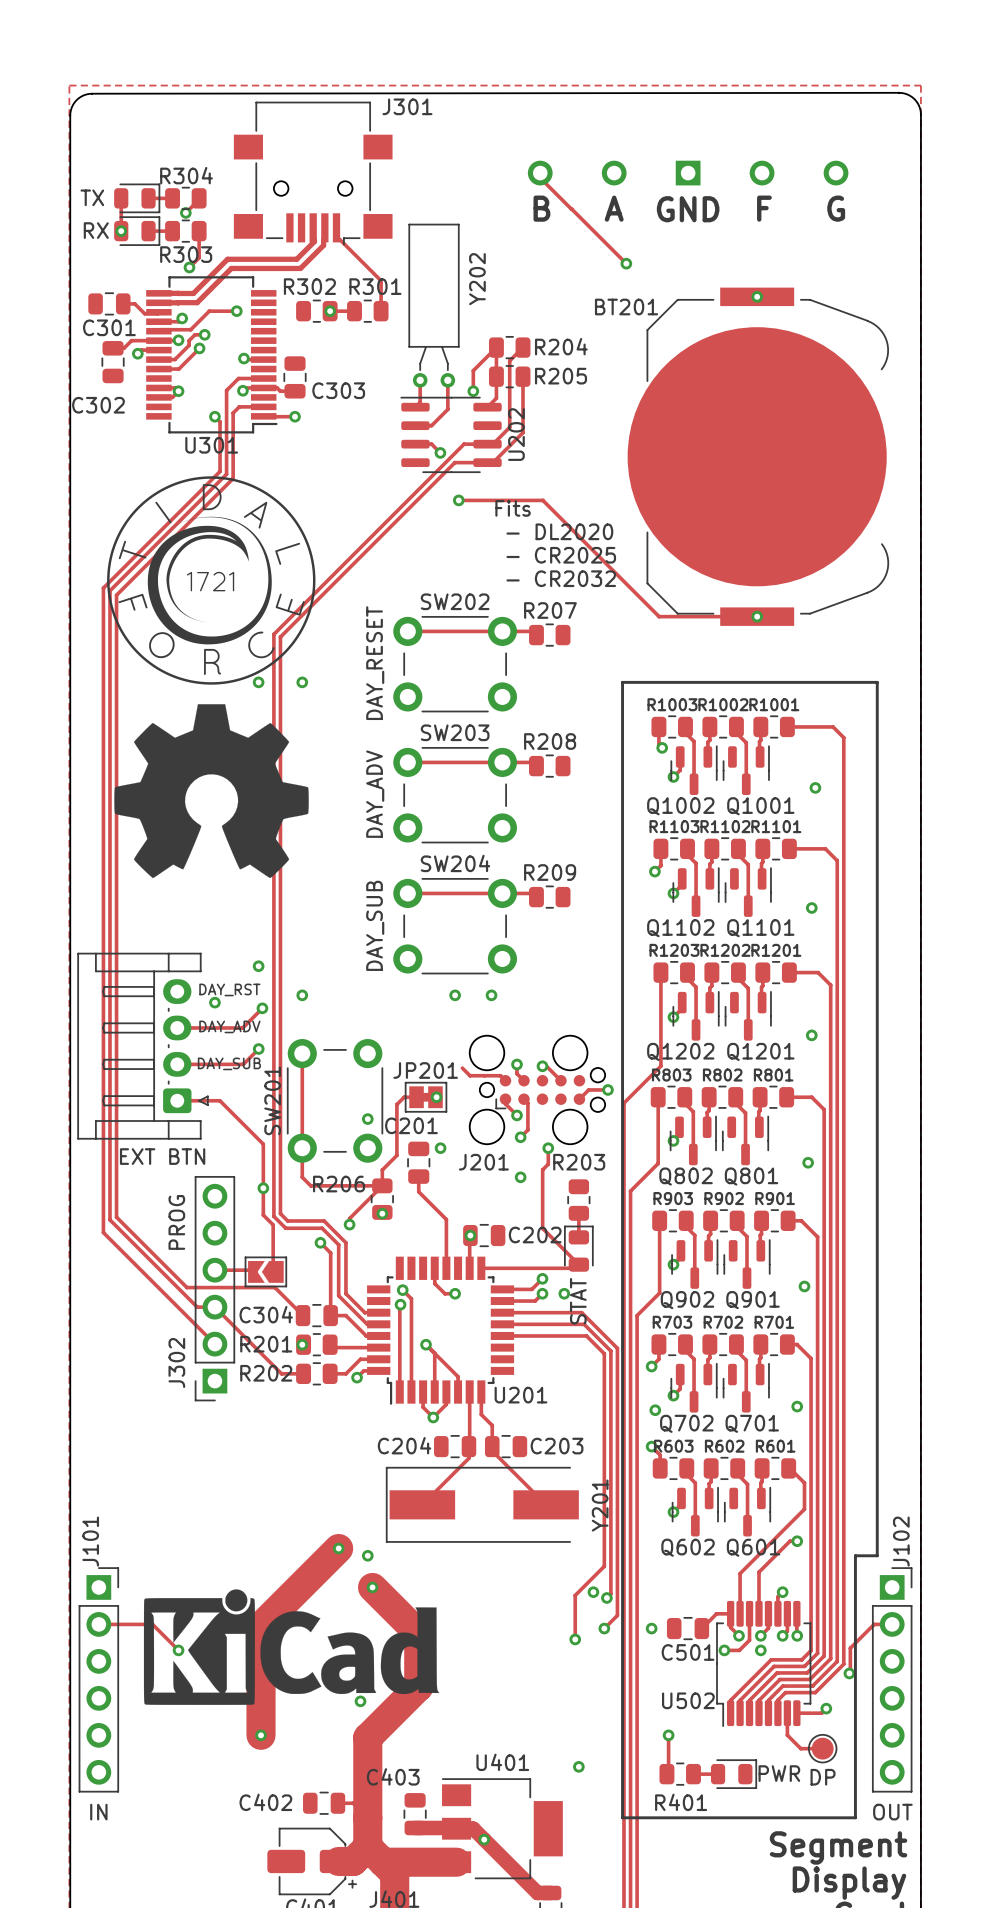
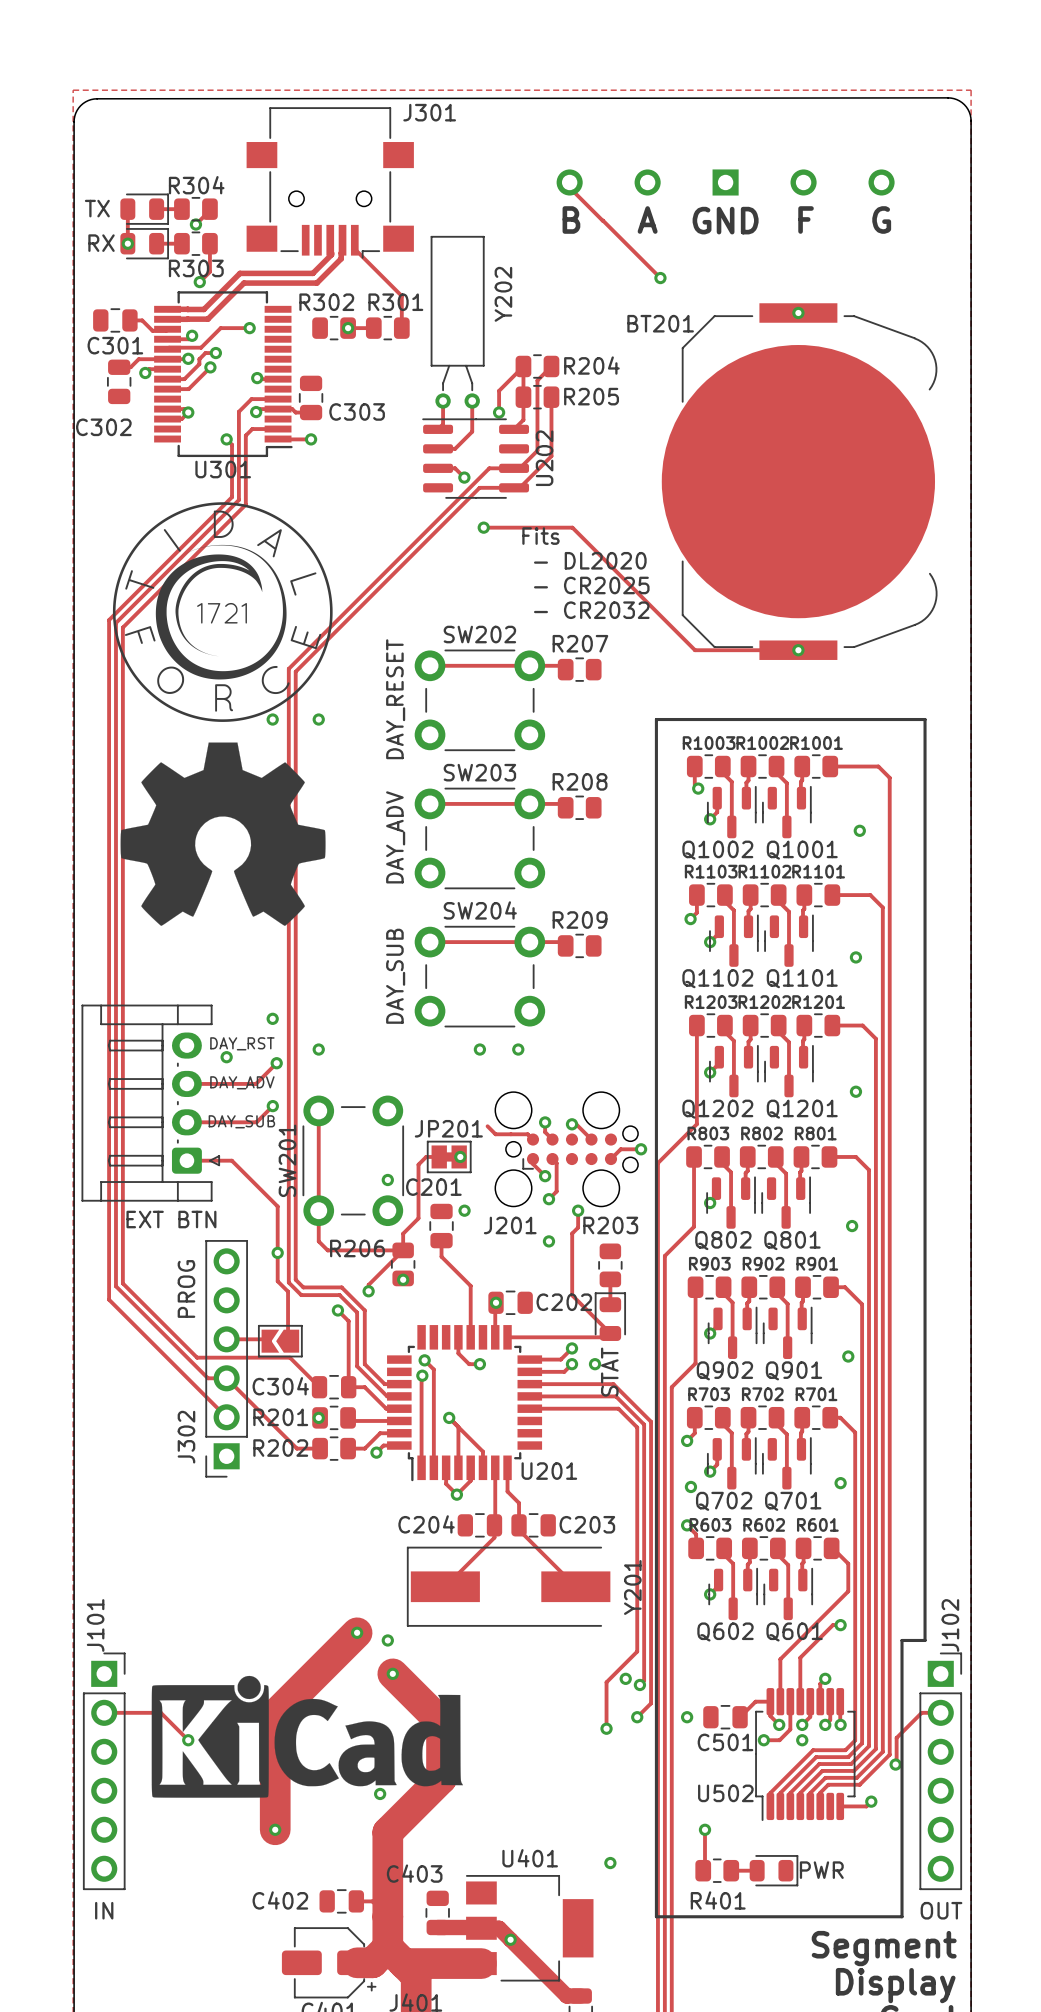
track: (787, 1713) (787, 1735) (800, 1748) (822, 1748) -> none
part: DP (822, 1748) -> none

